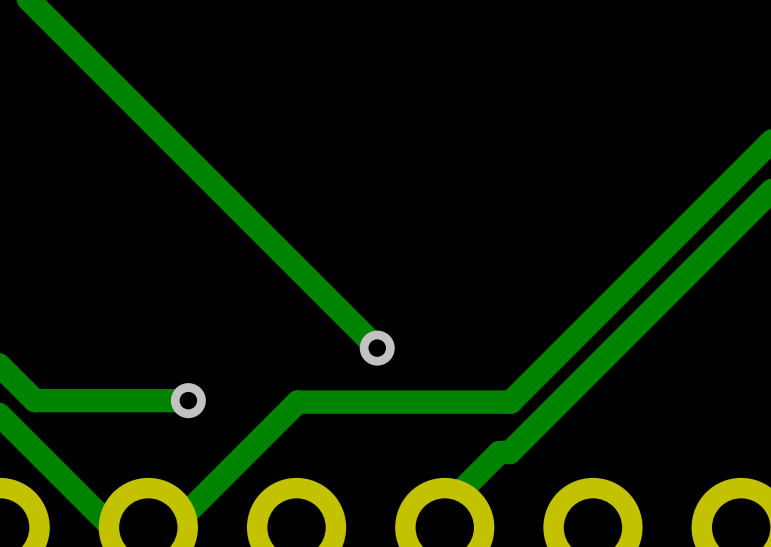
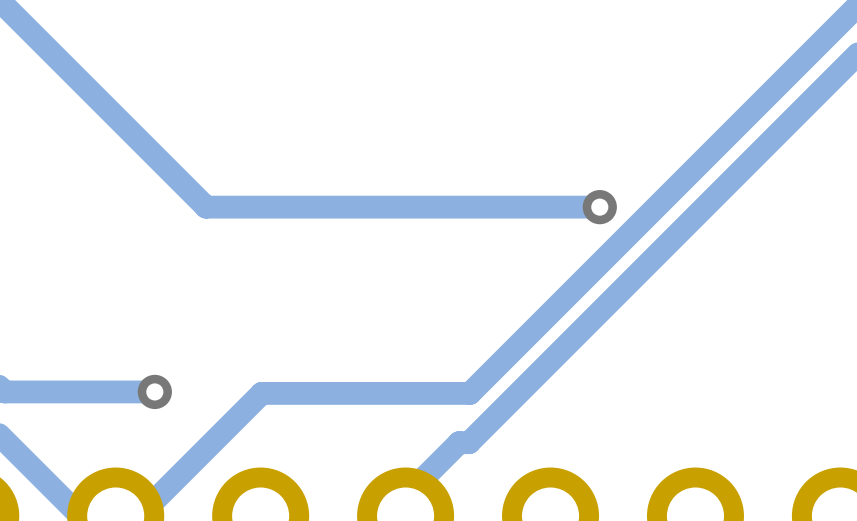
track: (240, 211) (377, 348) -> (206, 207) (599, 207)
via: none -> (599, 207)
via: (377, 348) -> none

